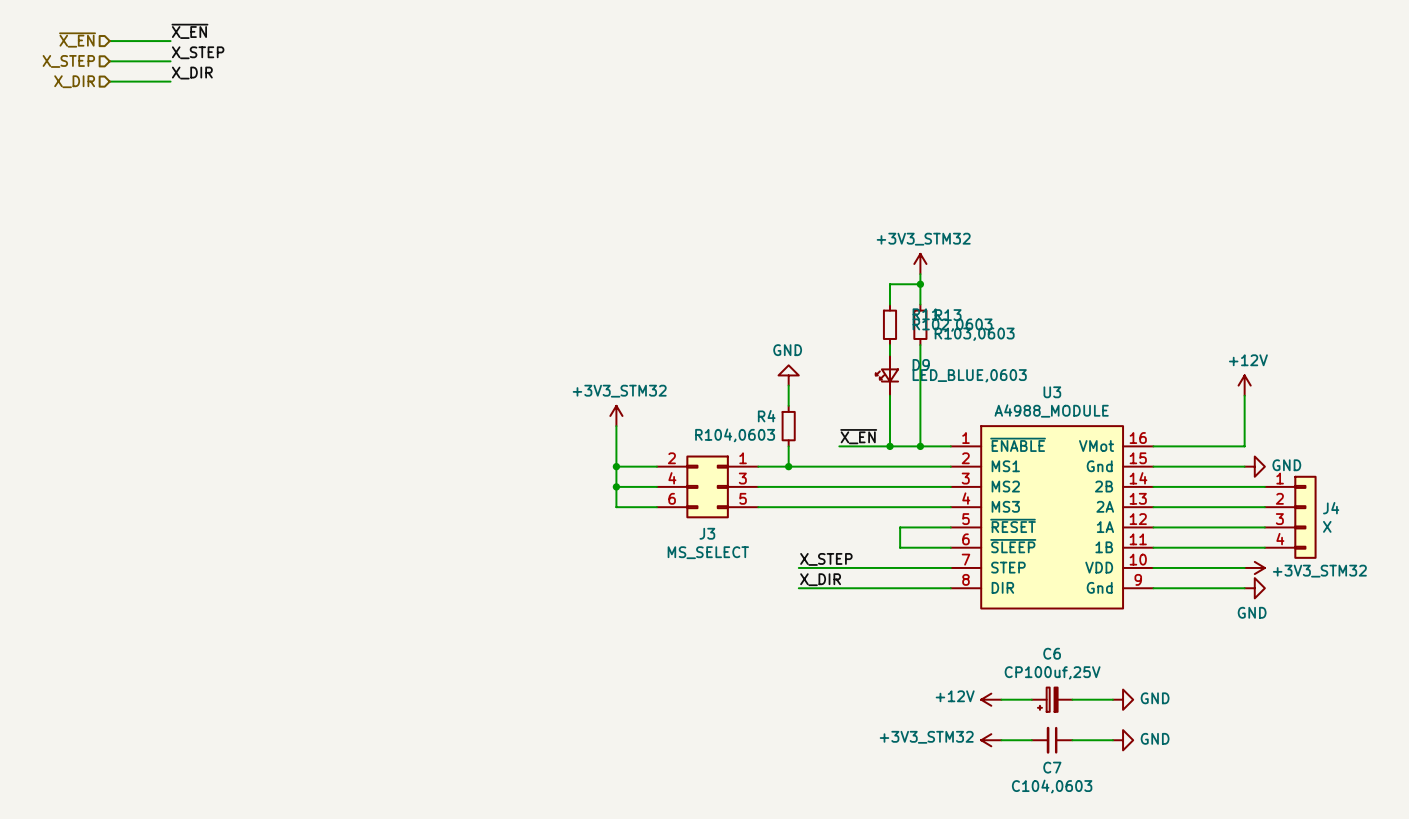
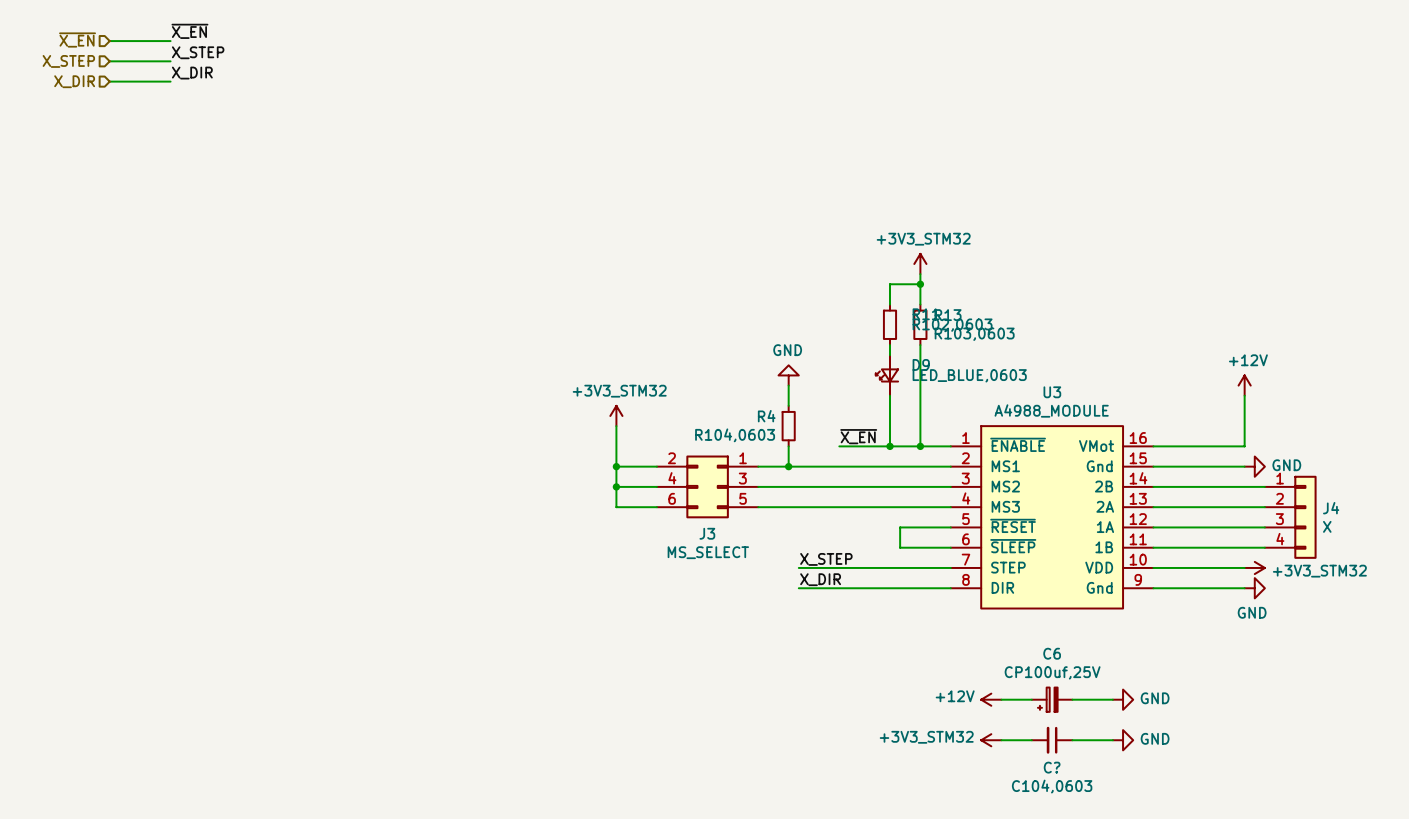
C7 name: C7 (1052, 767) -> C? (1052, 767)

